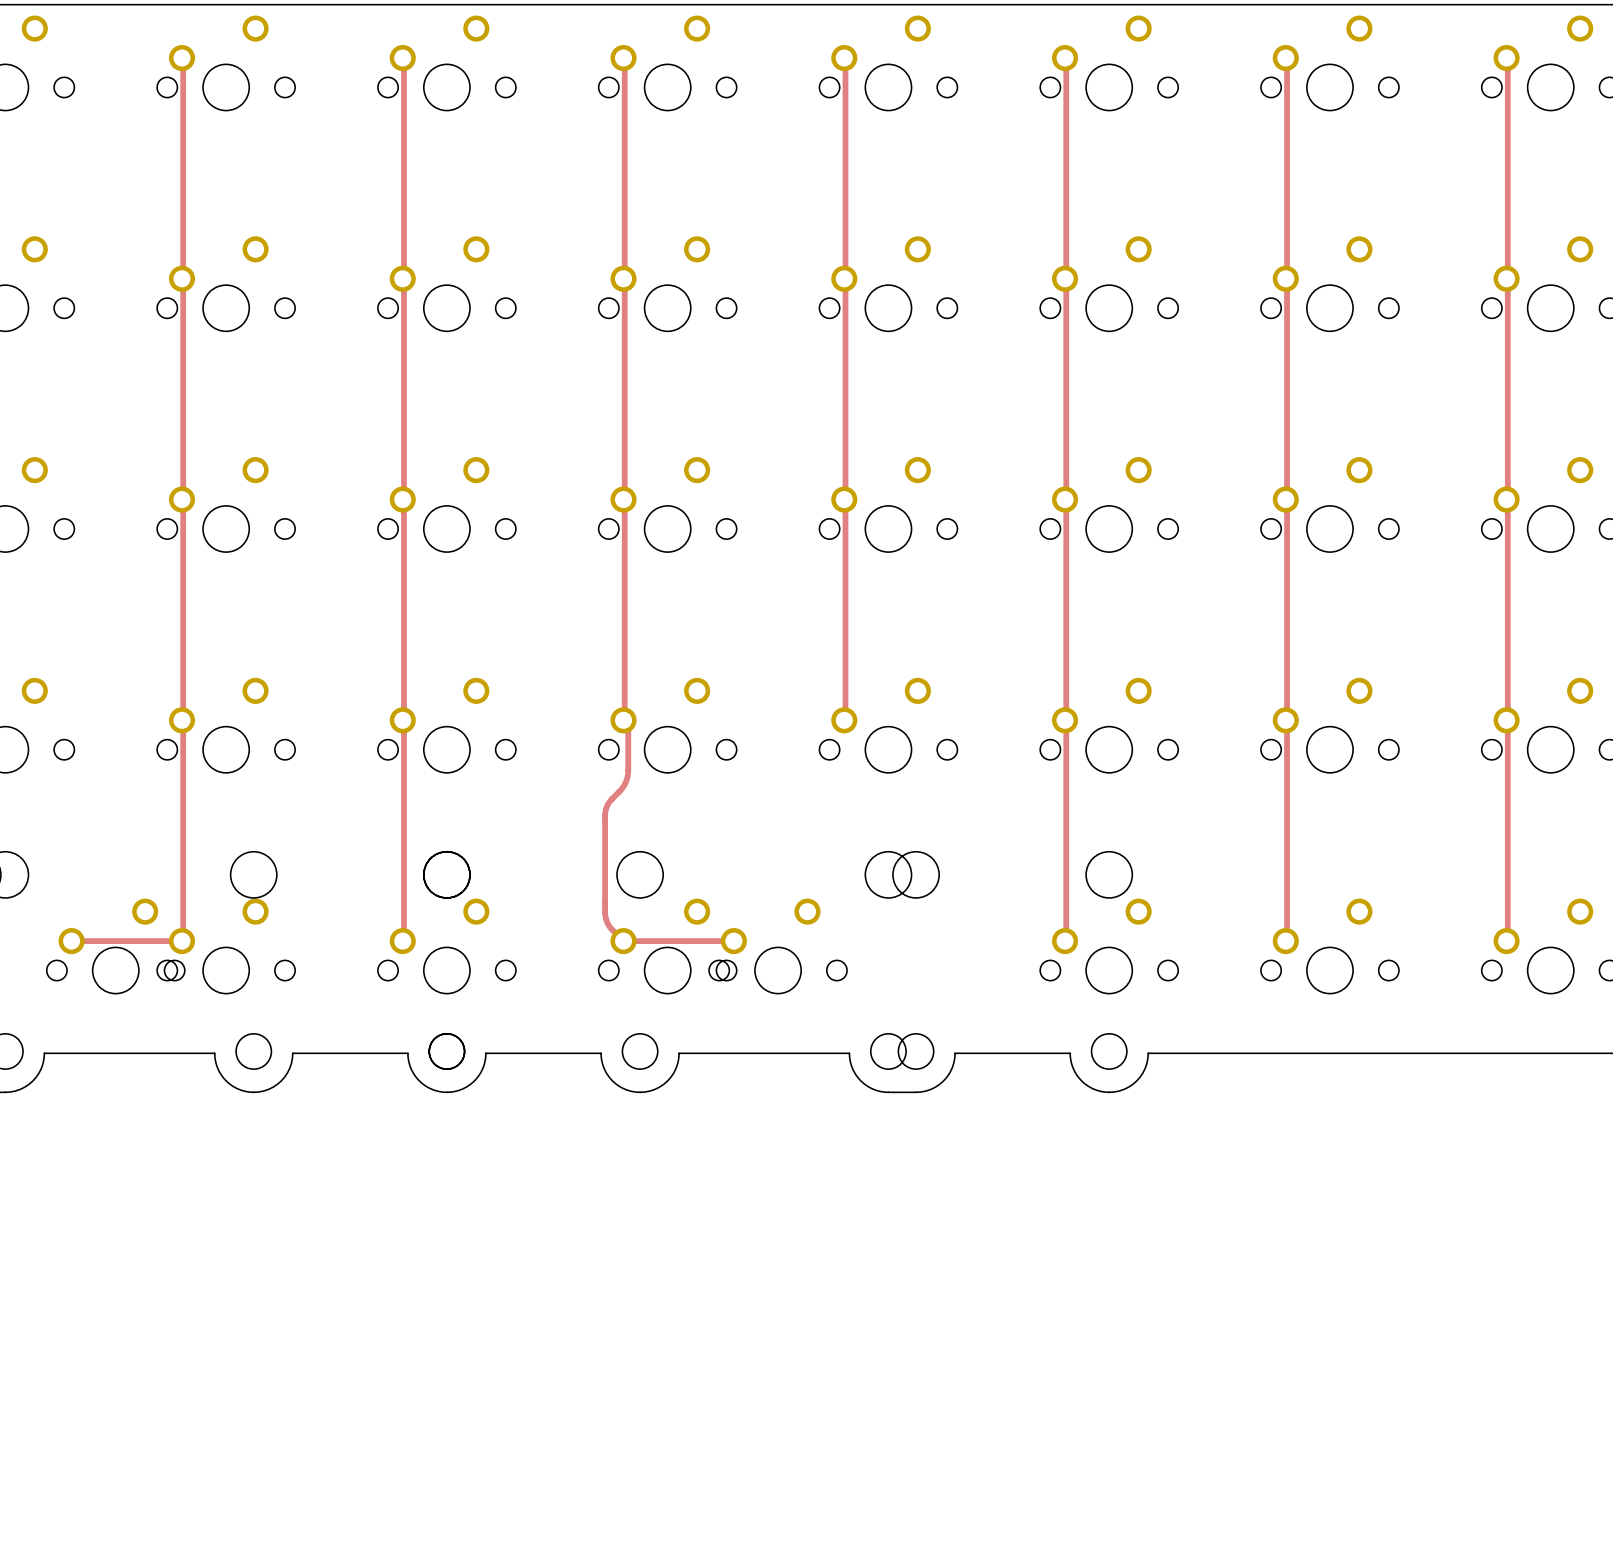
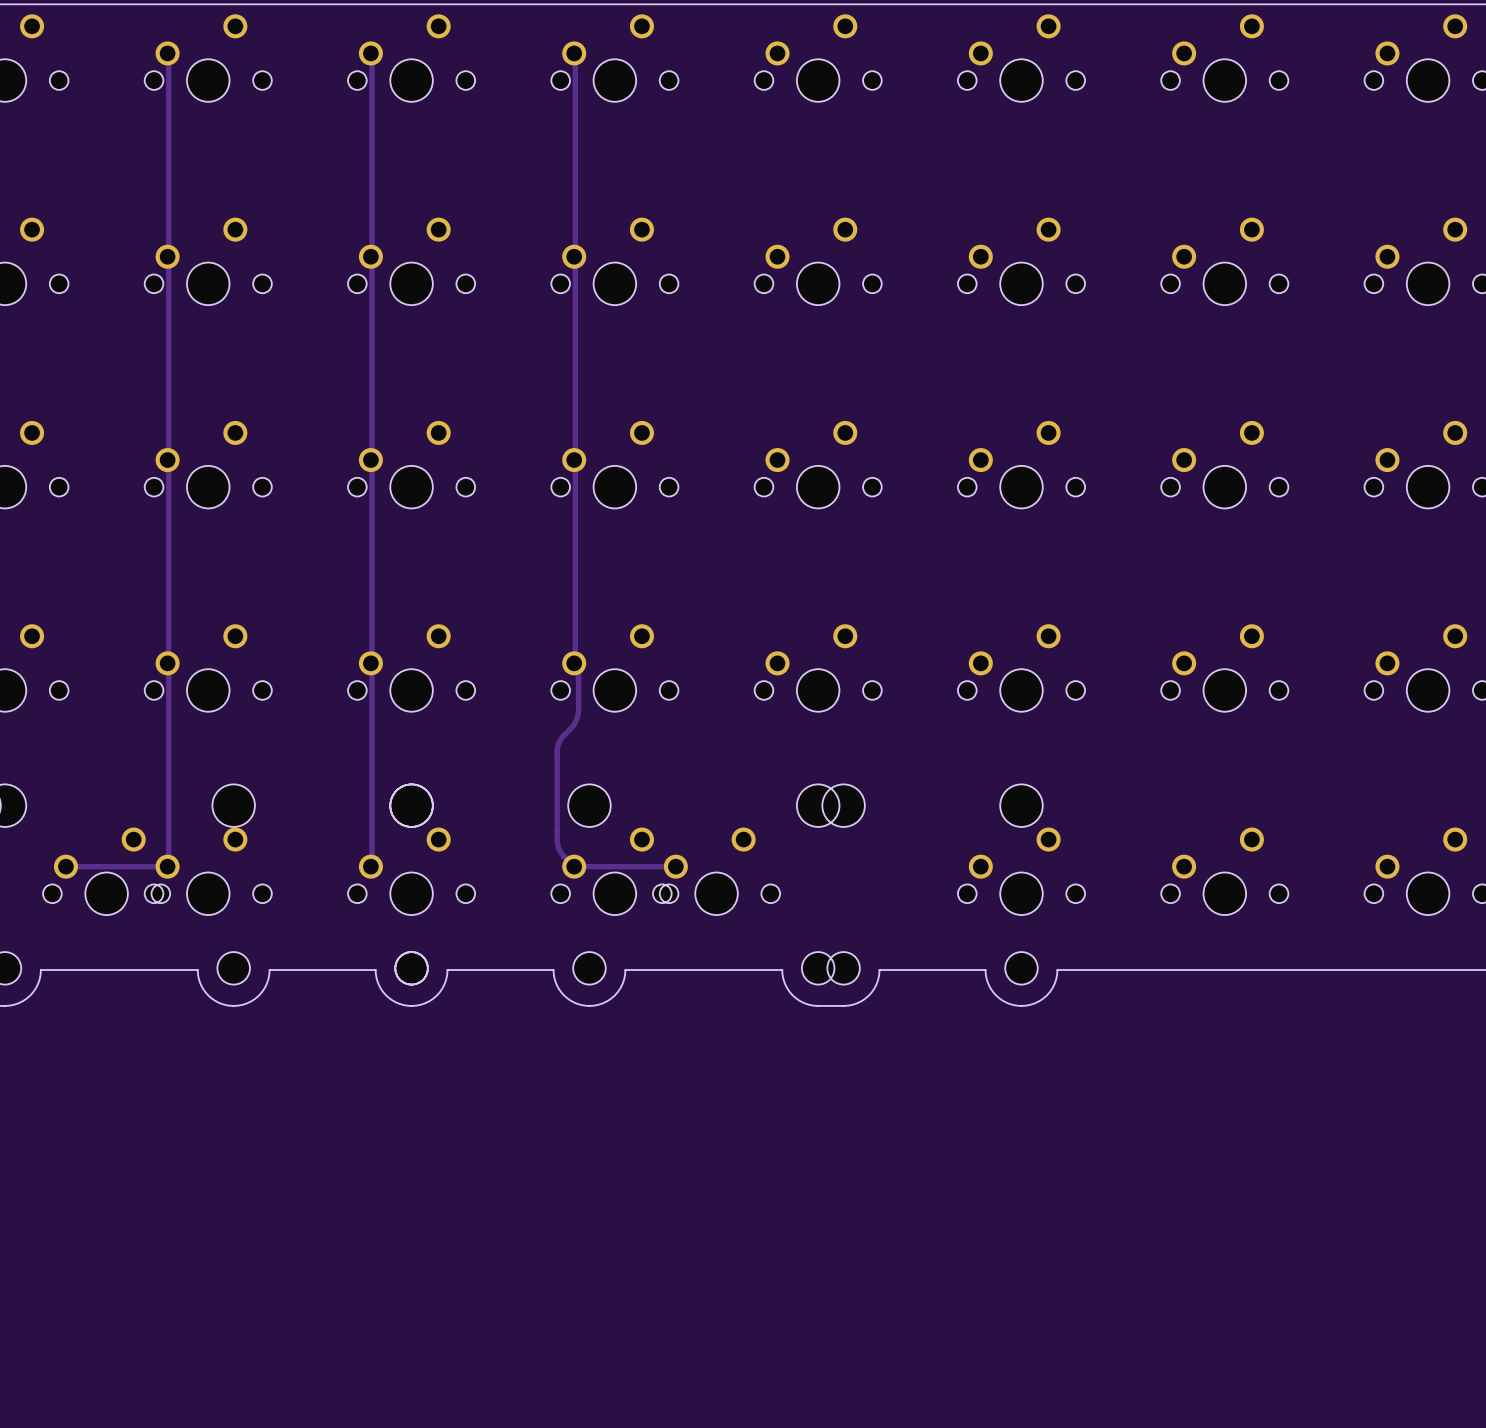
track: (845, 59) (844, 720) -> none
track: (1066, 59) (1065, 941) -> none
track: (1287, 59) (1285, 941) -> none
track: (1507, 59) (1506, 941) -> none

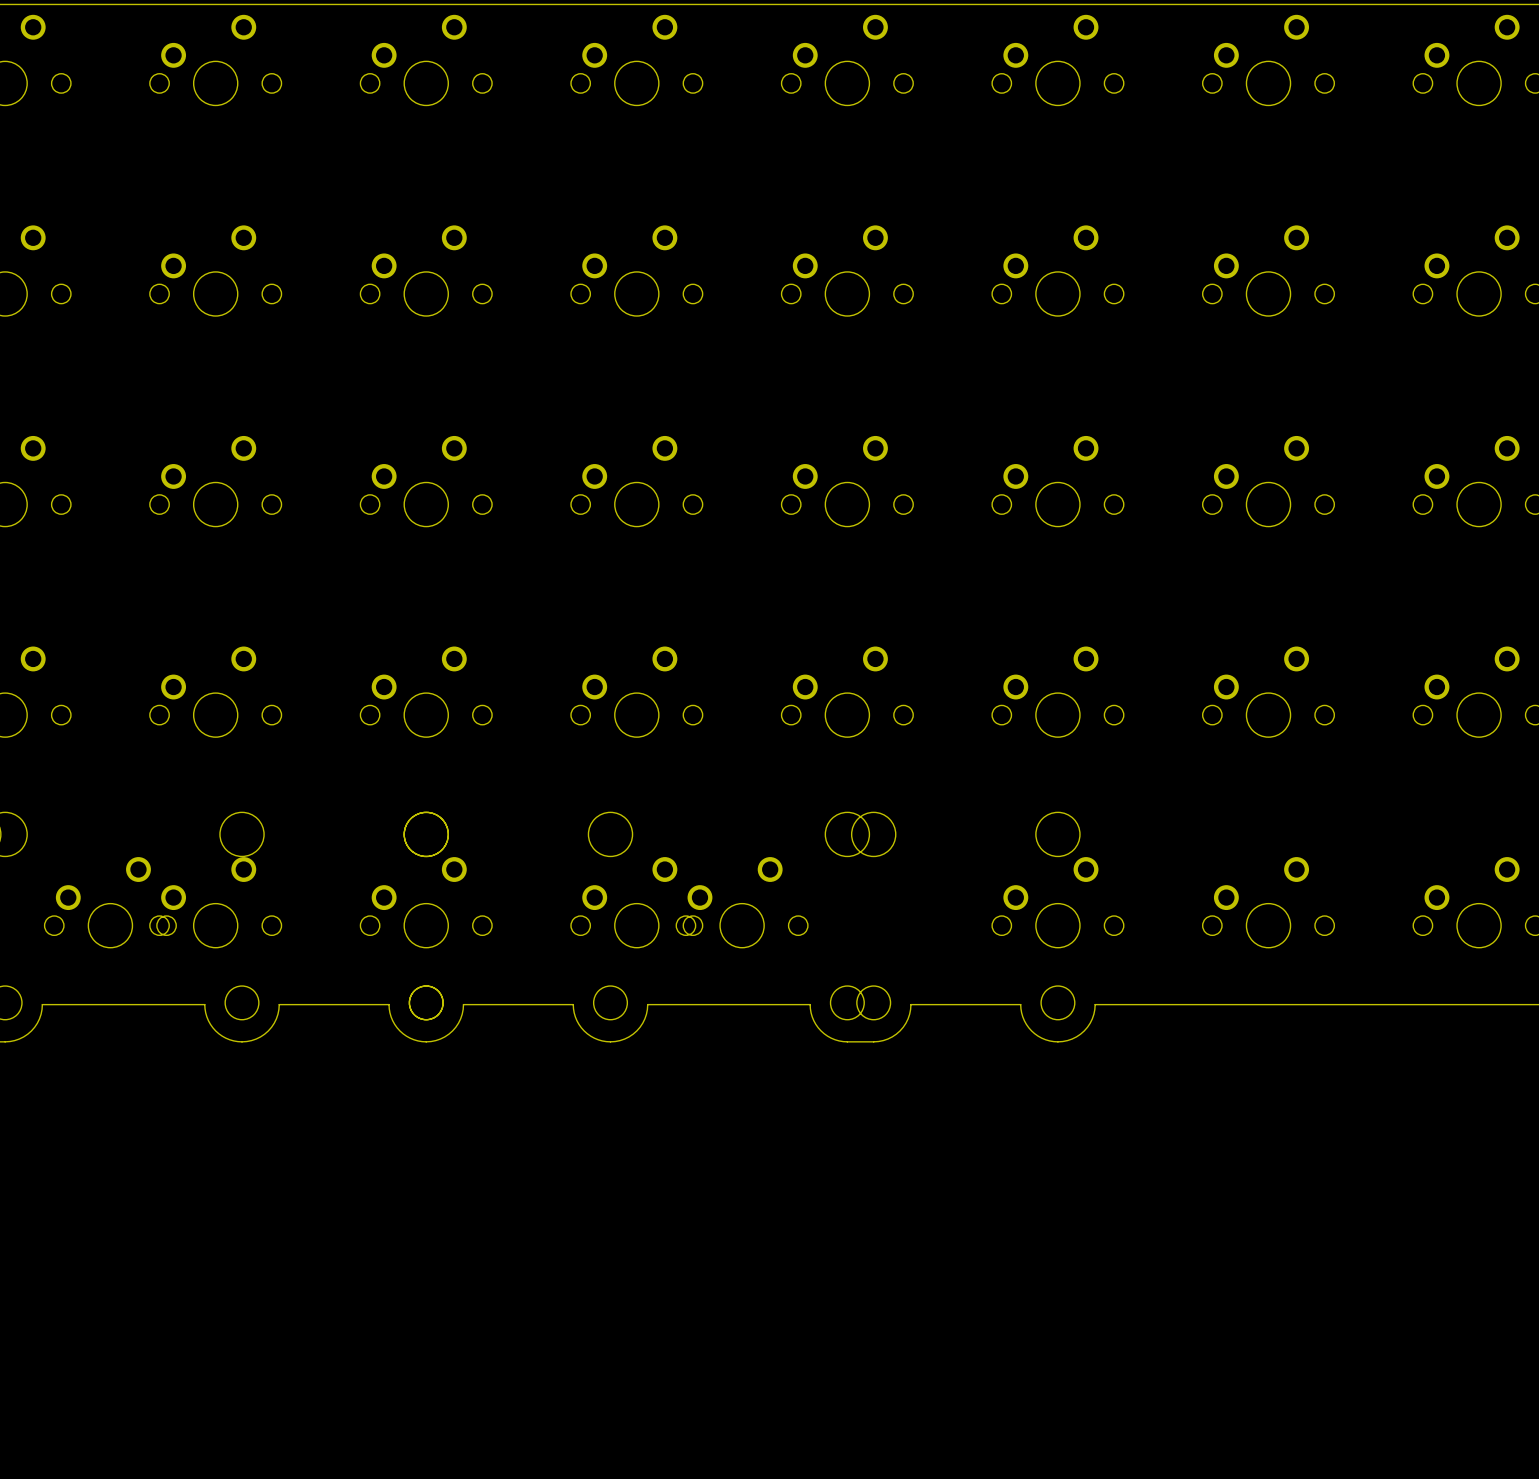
track: (168, 54) (168, 865) -> none
track: (372, 54) (370, 866) -> none
track: (575, 54) (575, 662) -> none
track: (574, 663) (578, 672) (578, 714) (573, 724) (560, 739) (557, 749) (557, 840) (560, 851) (574, 866) (675, 866) -> none
track: (65, 866) (167, 866) -> none

